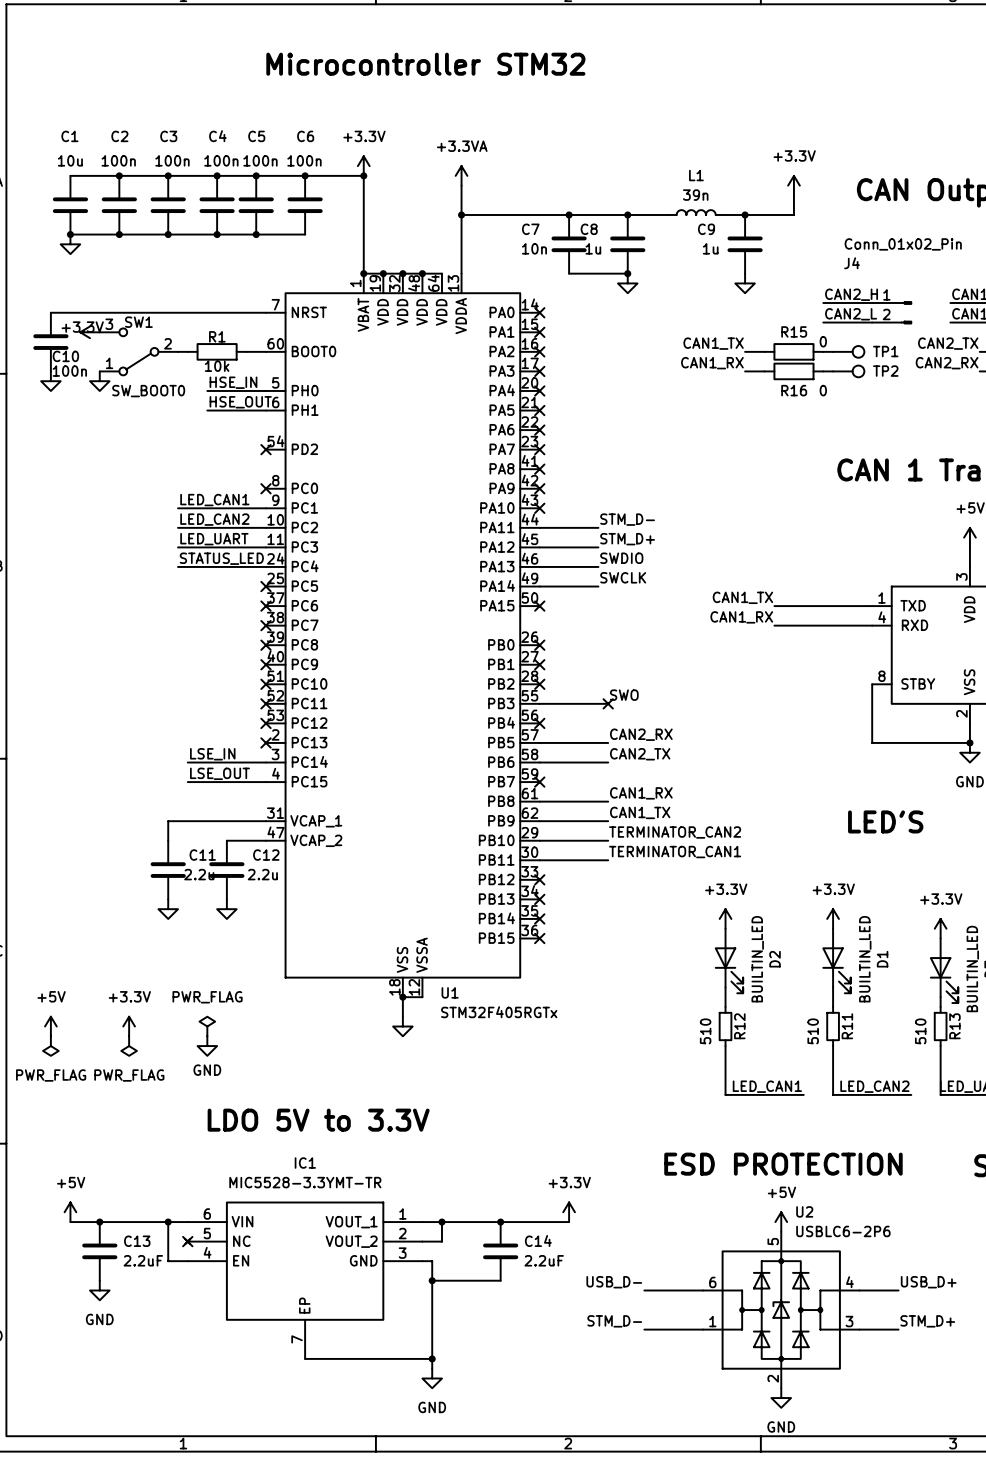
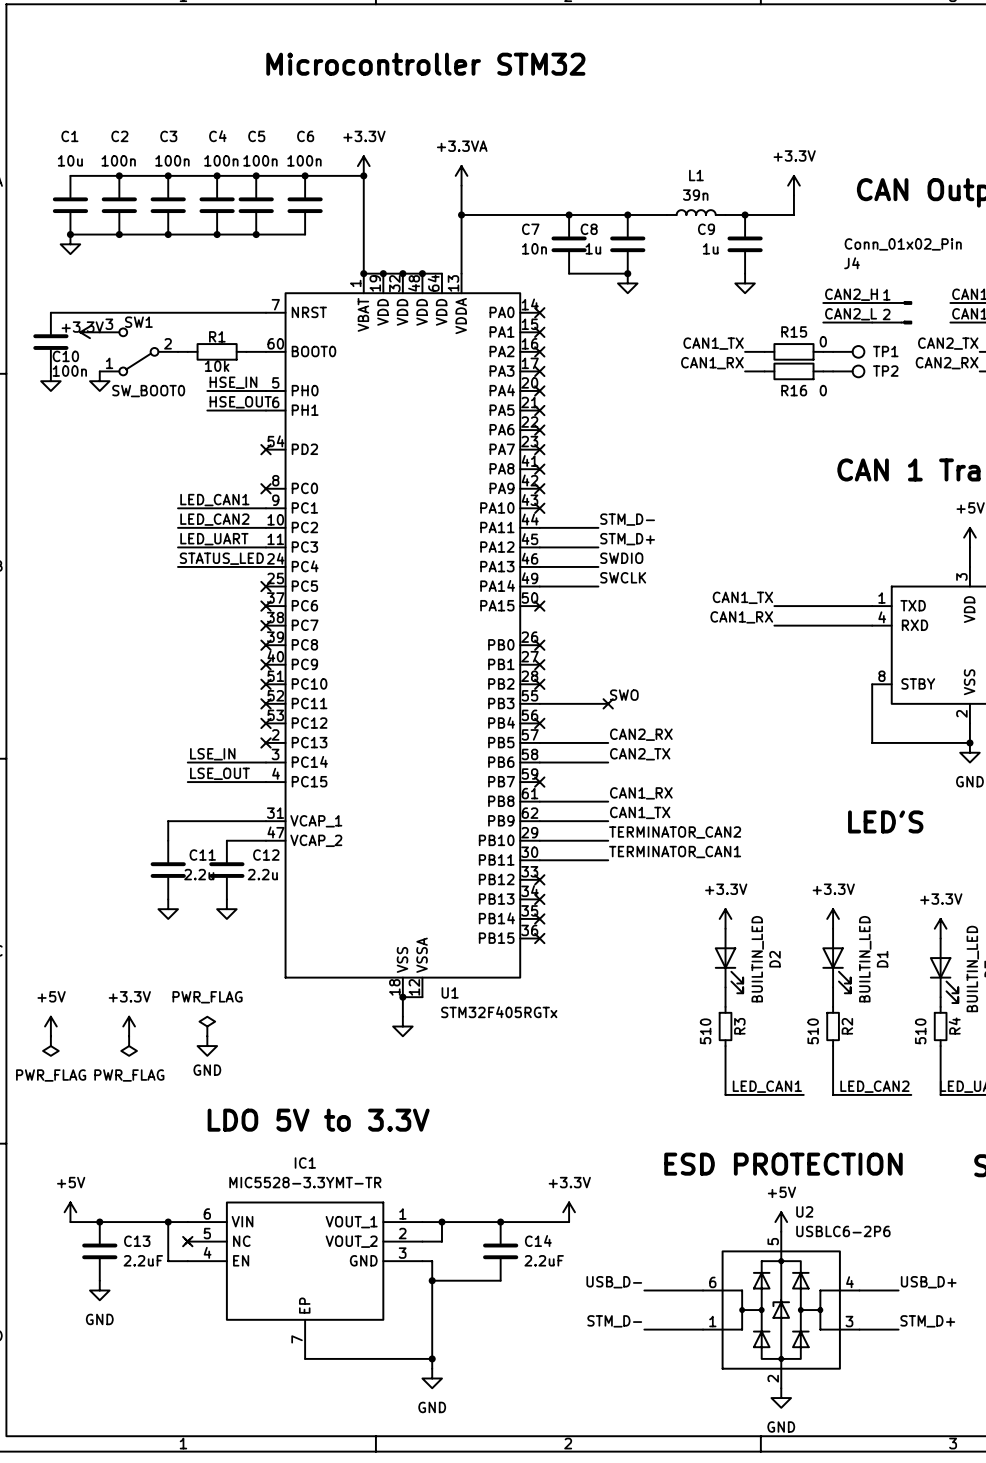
R12 name: R12 (739, 1026) -> R3 (739, 1026)
R11 name: R11 (847, 1026) -> R2 (847, 1026)
R13 name: R13 (954, 1026) -> R4 (954, 1026)

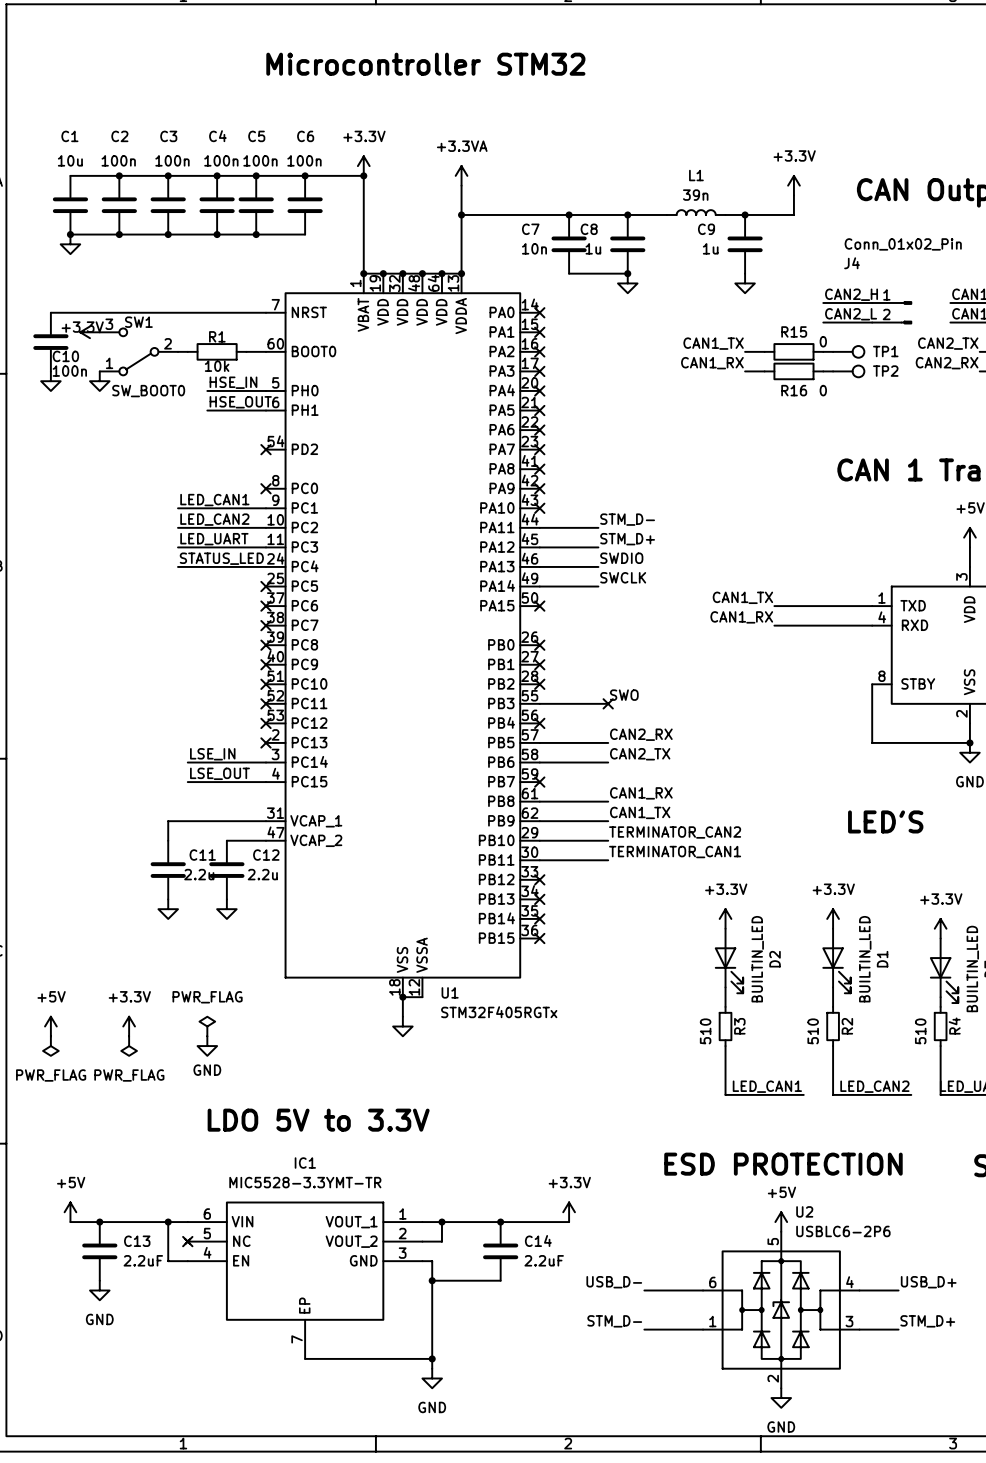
wire: none -> (441, 273) (461, 273)
junction: none -> (441, 273)
junction: none -> (461, 273)

